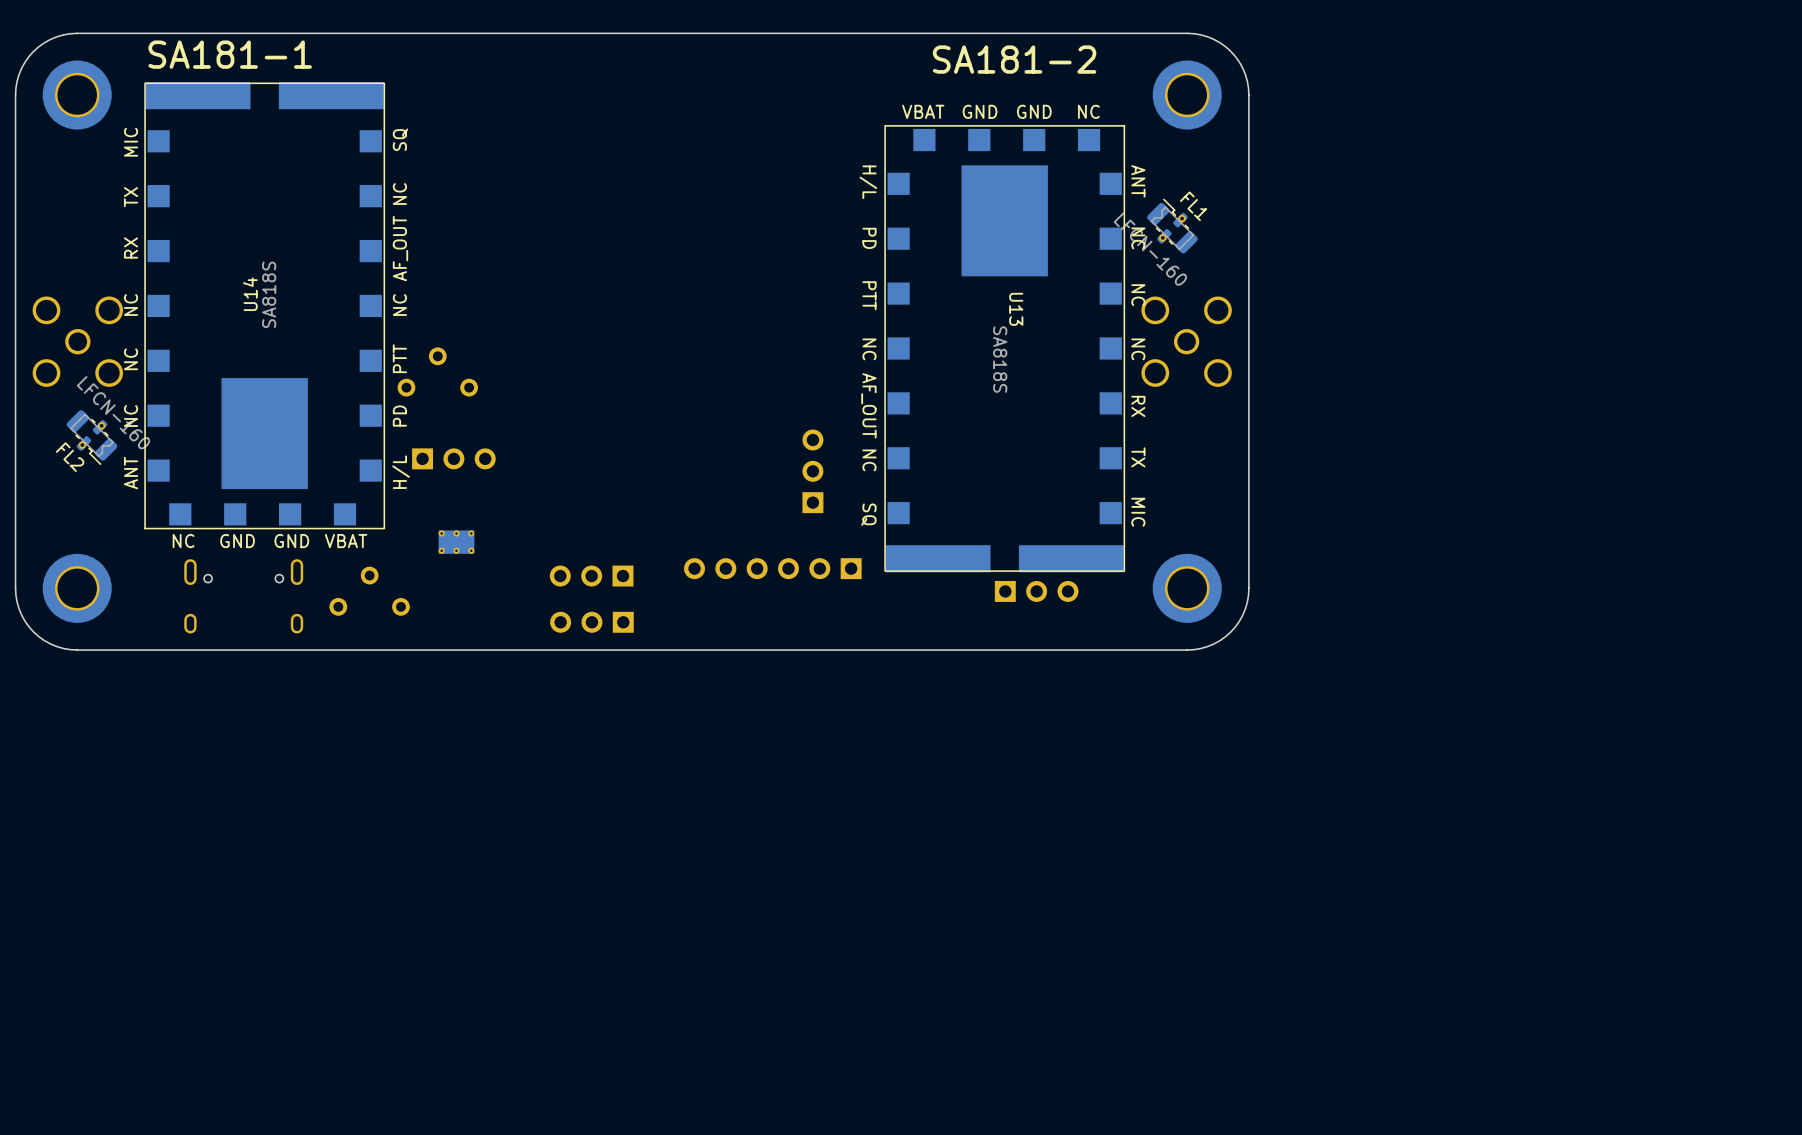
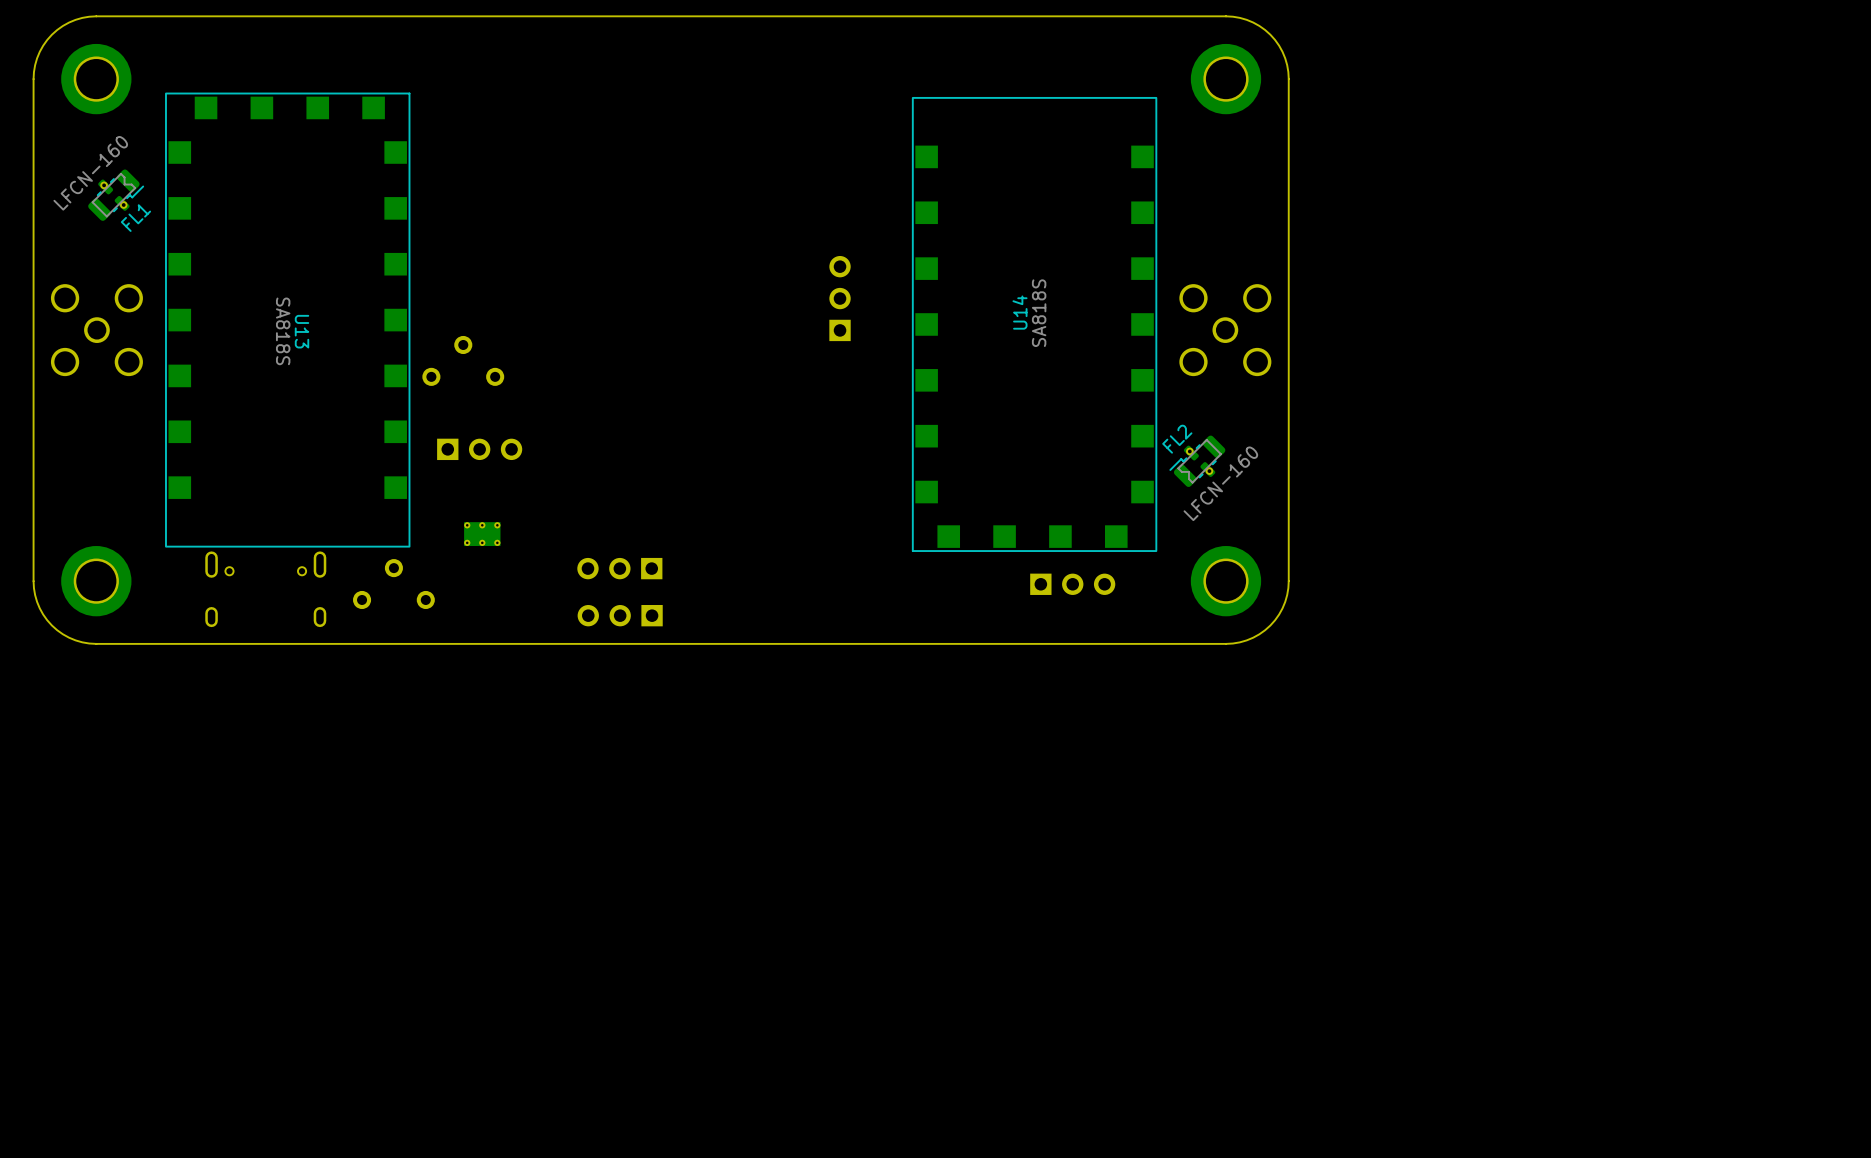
text: SA181-1 (230, 54) -> none
text: SA181-2 (1014, 59) -> none
U14 footprint: [144, 82, 386, 530] -> [912, 97, 1158, 552]
U13 footprint: [884, 125, 1126, 573] -> [165, 92, 411, 548]
FL1 rotation: 0° (1172, 226) -> 90° clockwise (116, 195)
FL1 position: (1172, 226) -> (116, 195)
U13 name position: U13 (1016, 309) -> U13 (302, 331)
FL2 rotation: 0° (92, 437) -> 90° clockwise (1197, 461)
FL2 position: (92, 437) -> (1197, 461)
part position: (812, 471) -> (840, 298)
part: (772, 568) -> none

